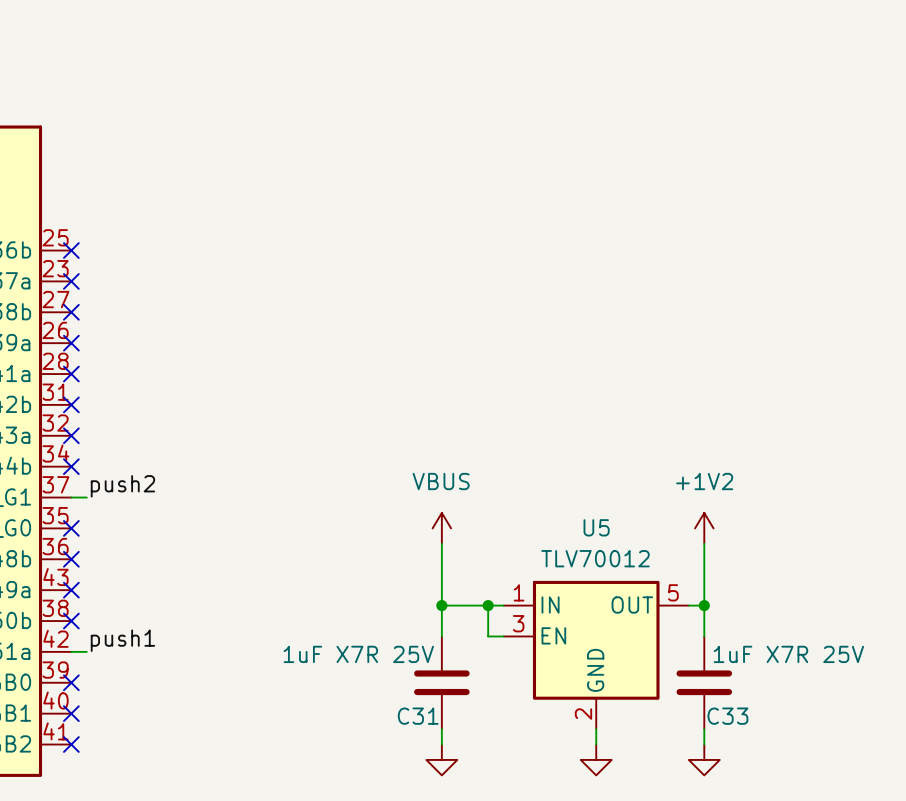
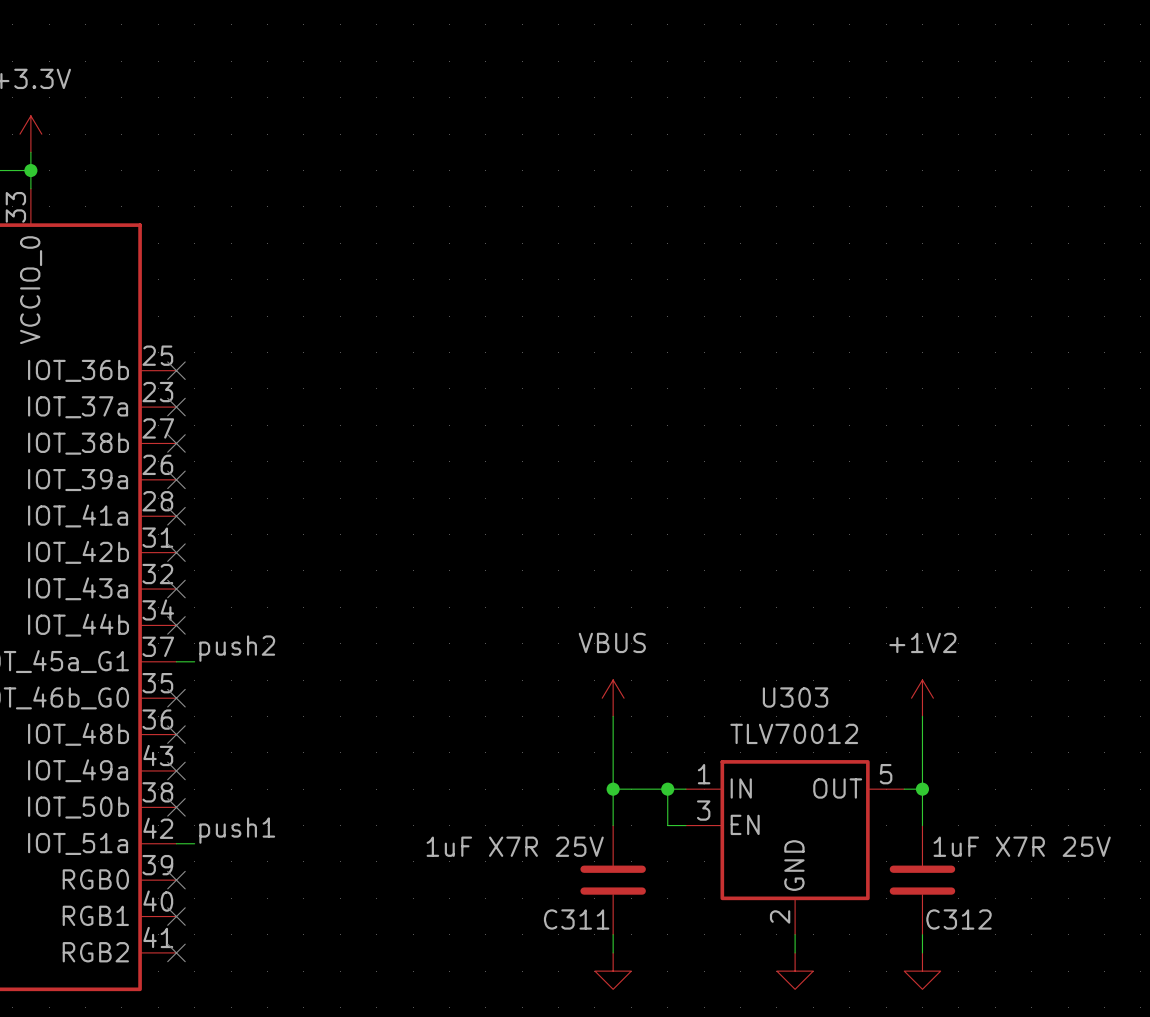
U5 name: U5 (596, 527) -> U303 (795, 697)
C31 name: C31 (418, 716) -> C311 (576, 919)
C33 name: C33 (727, 716) -> C312 (958, 919)

